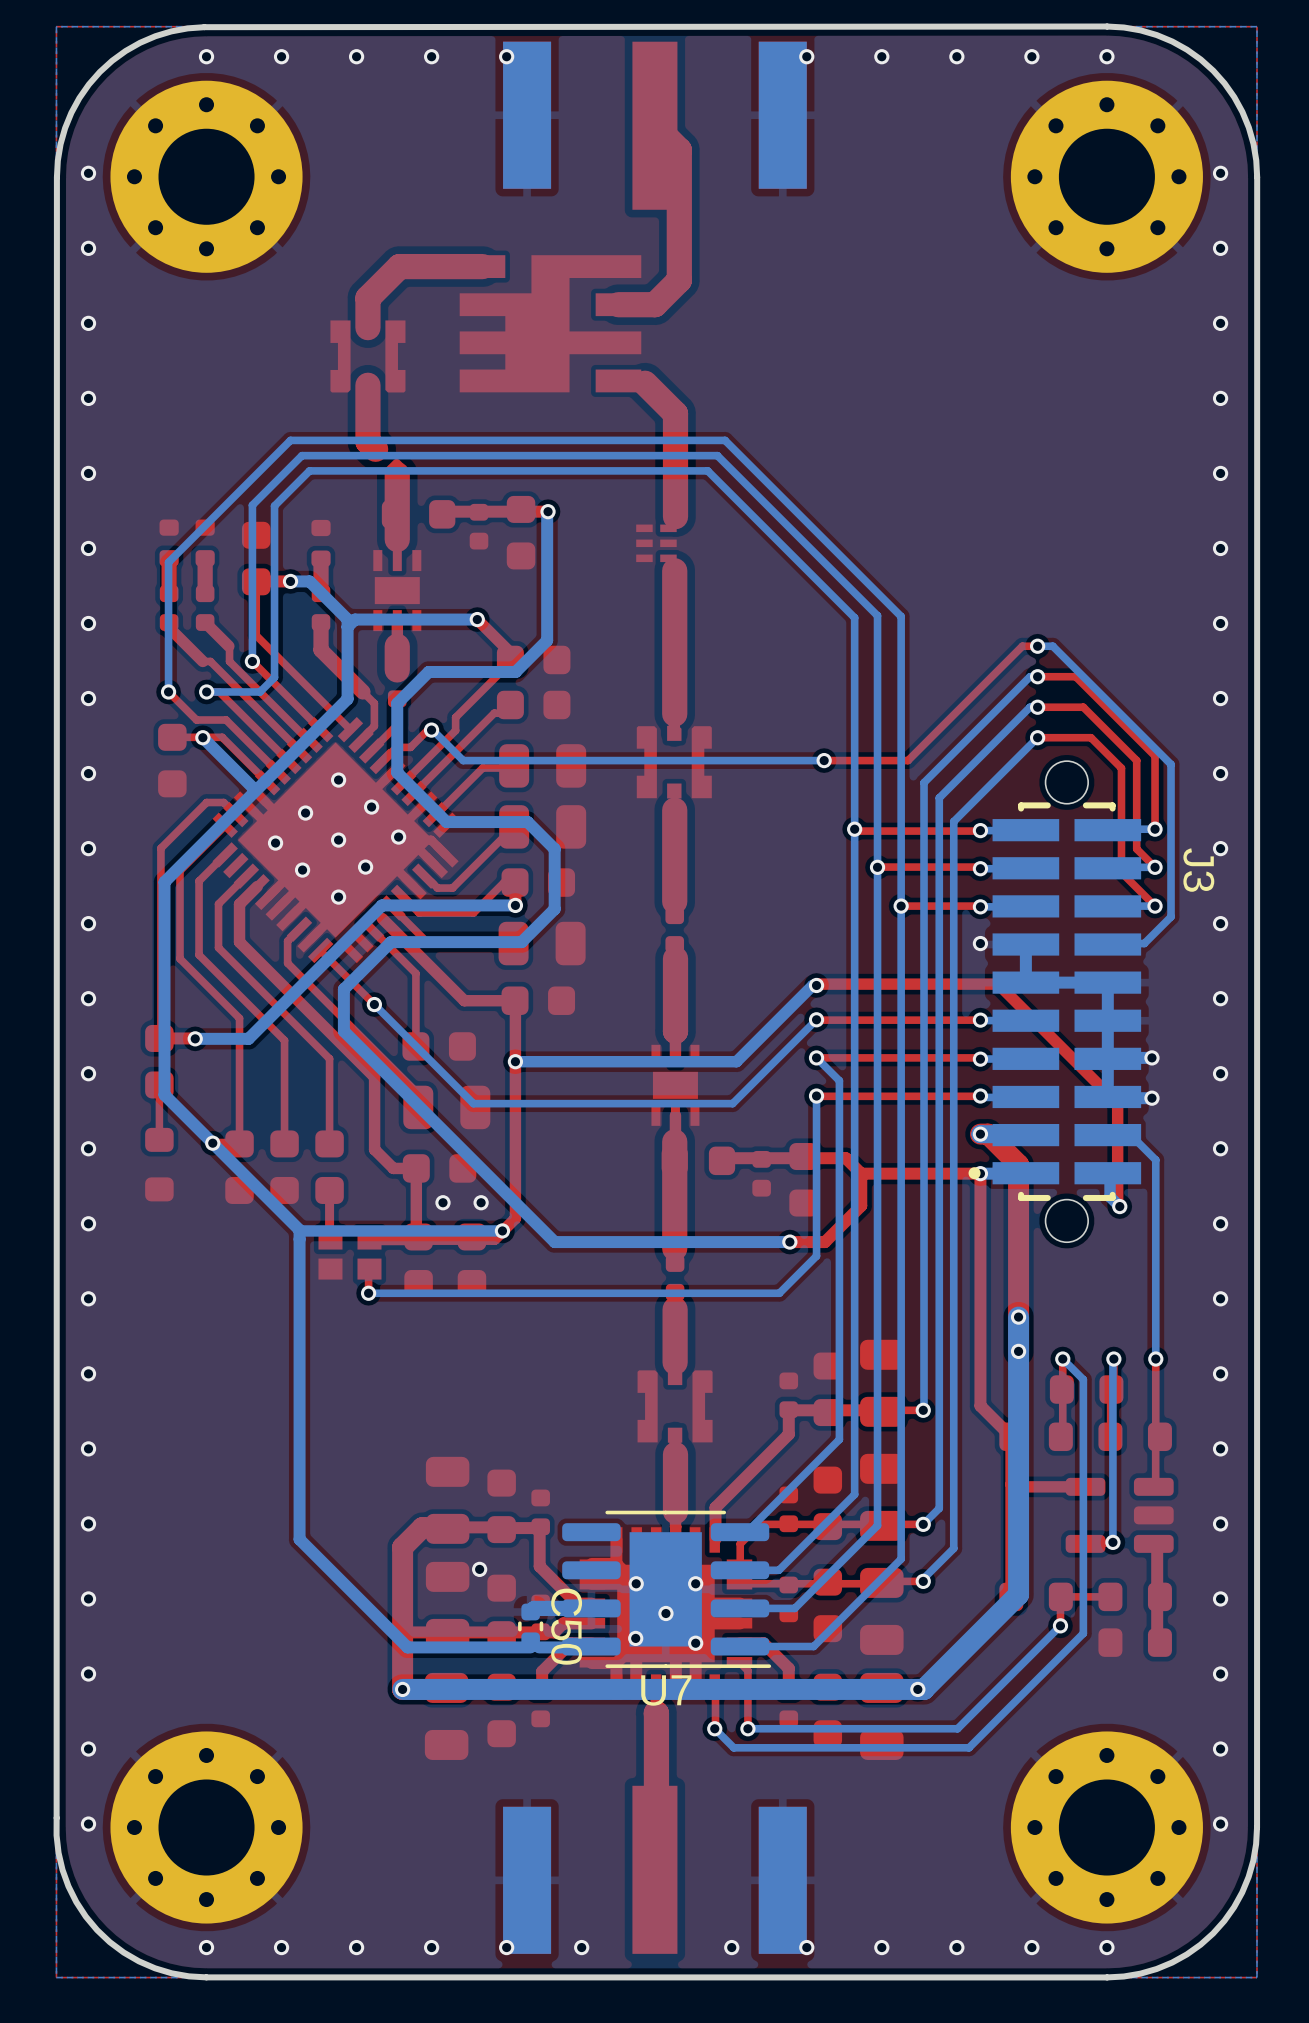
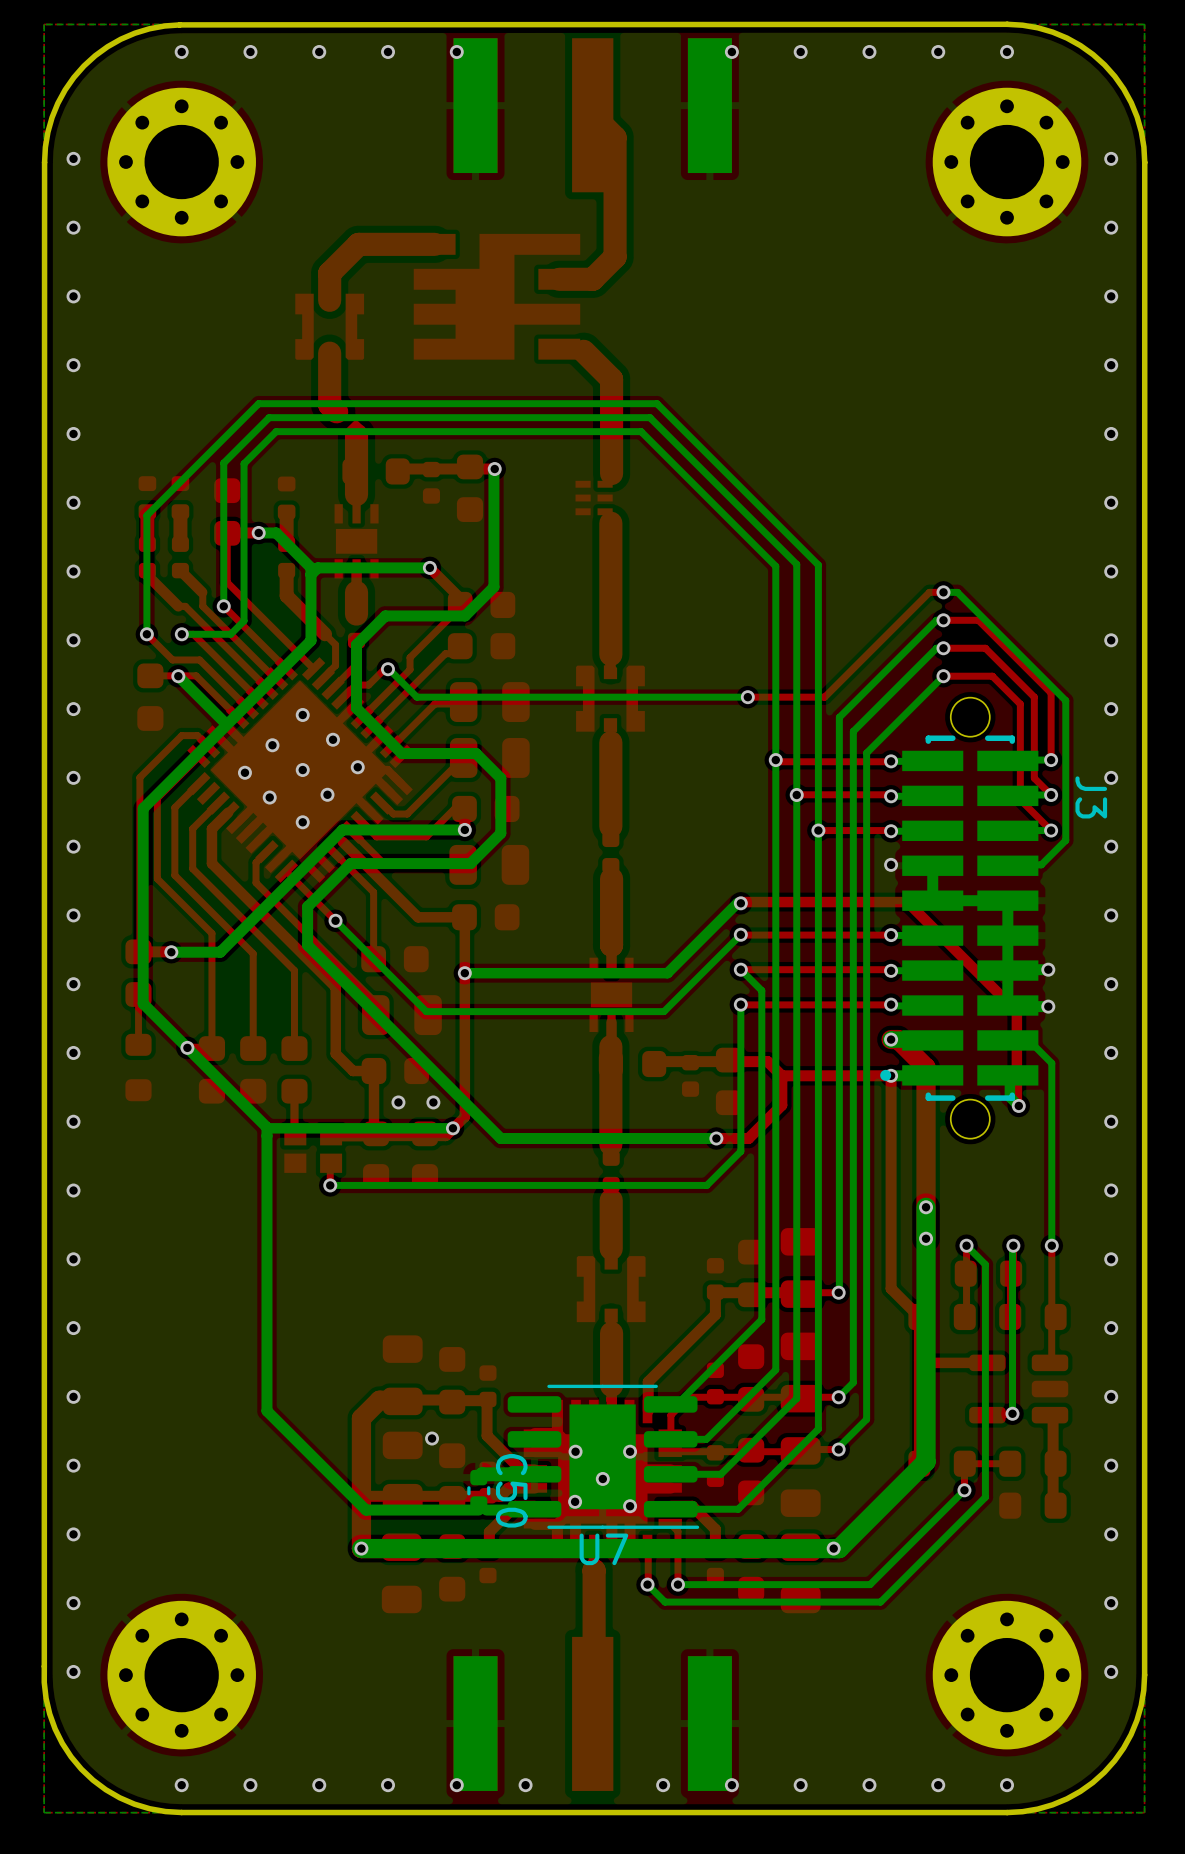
part footprint: [110, 80, 303, 273] -> [107, 87, 256, 237]
part footprint: [1010, 80, 1203, 273] -> [932, 87, 1082, 237]
part footprint: [110, 1731, 303, 1924] -> [107, 1600, 256, 1750]
part footprint: [1010, 1731, 1203, 1924] -> [932, 1600, 1082, 1750]

